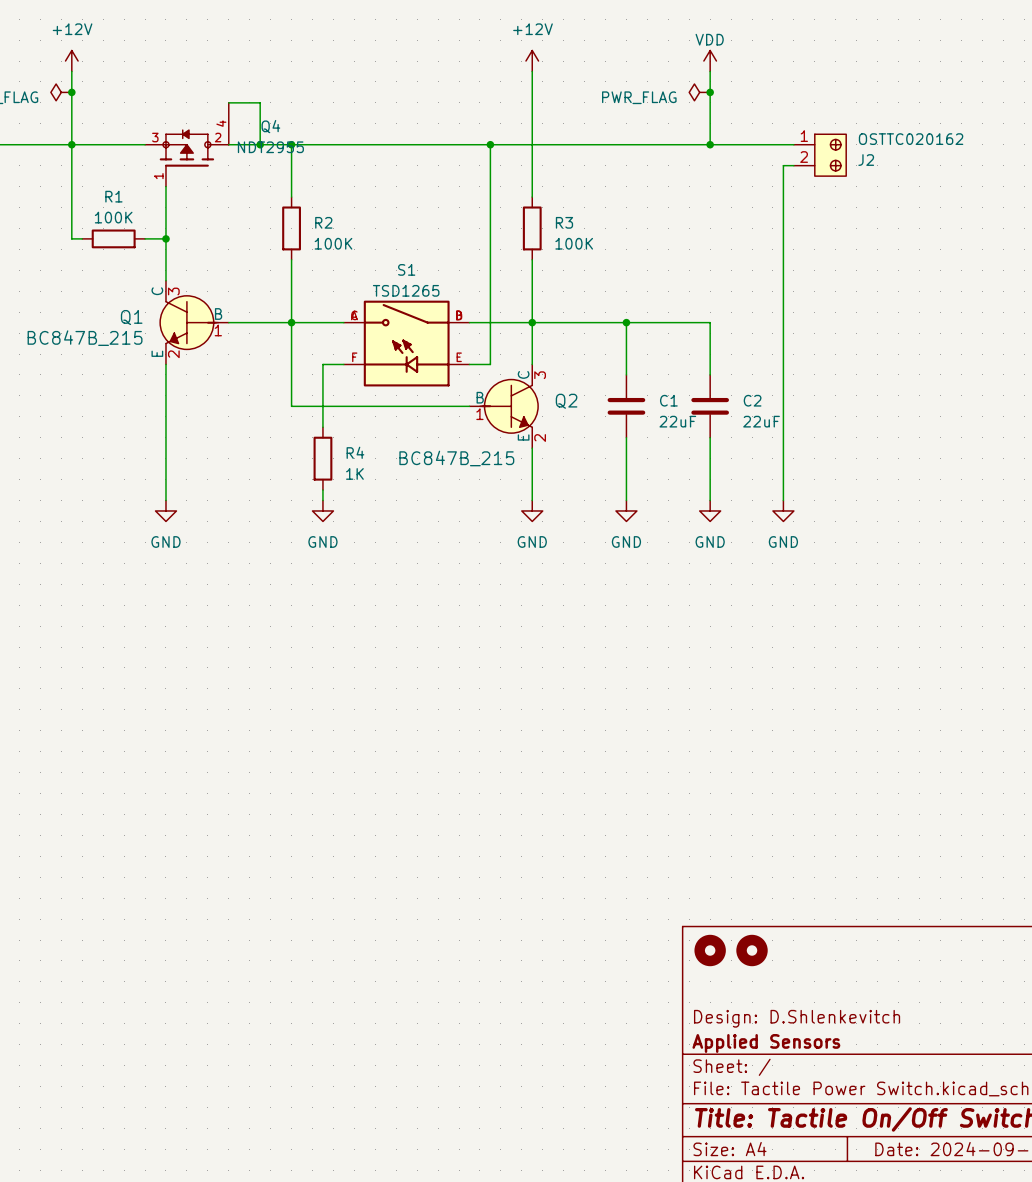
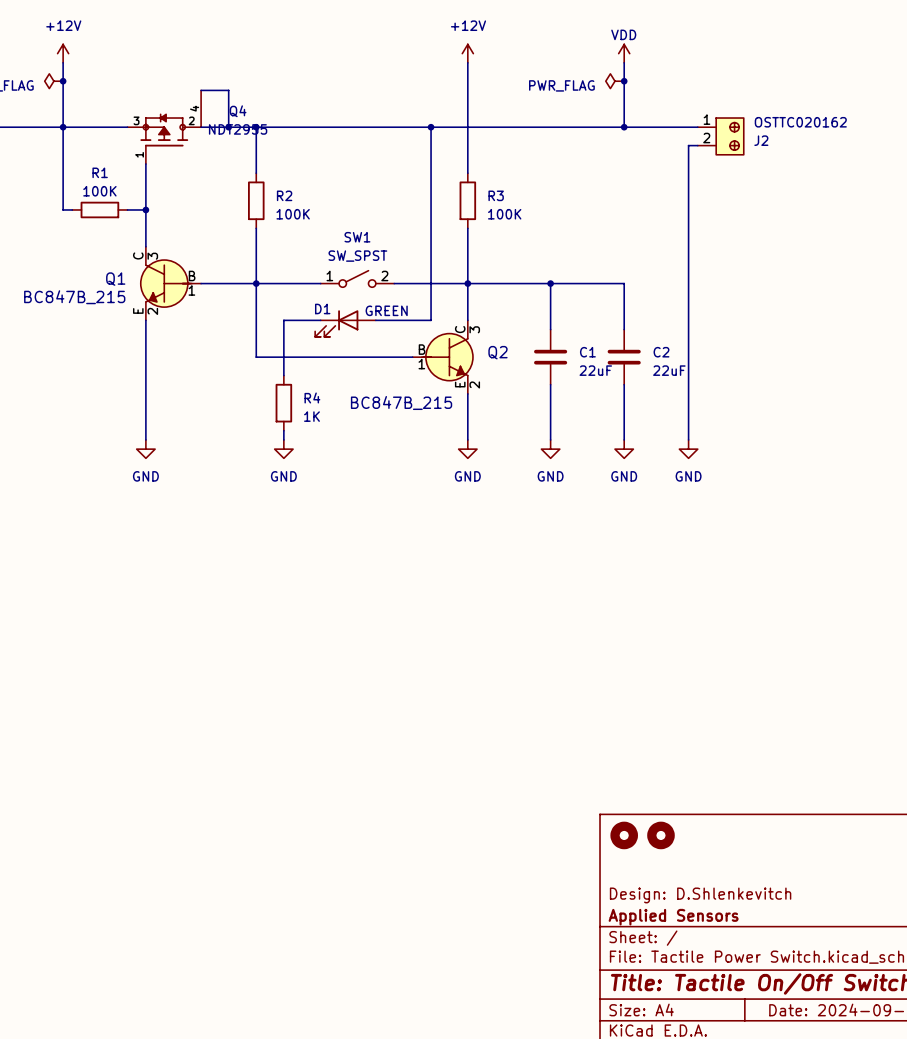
SW1: none -> SW_SPST (357, 278)
S1: TSD1265 (406, 343) -> none
D1: none -> GREEN (345, 323)

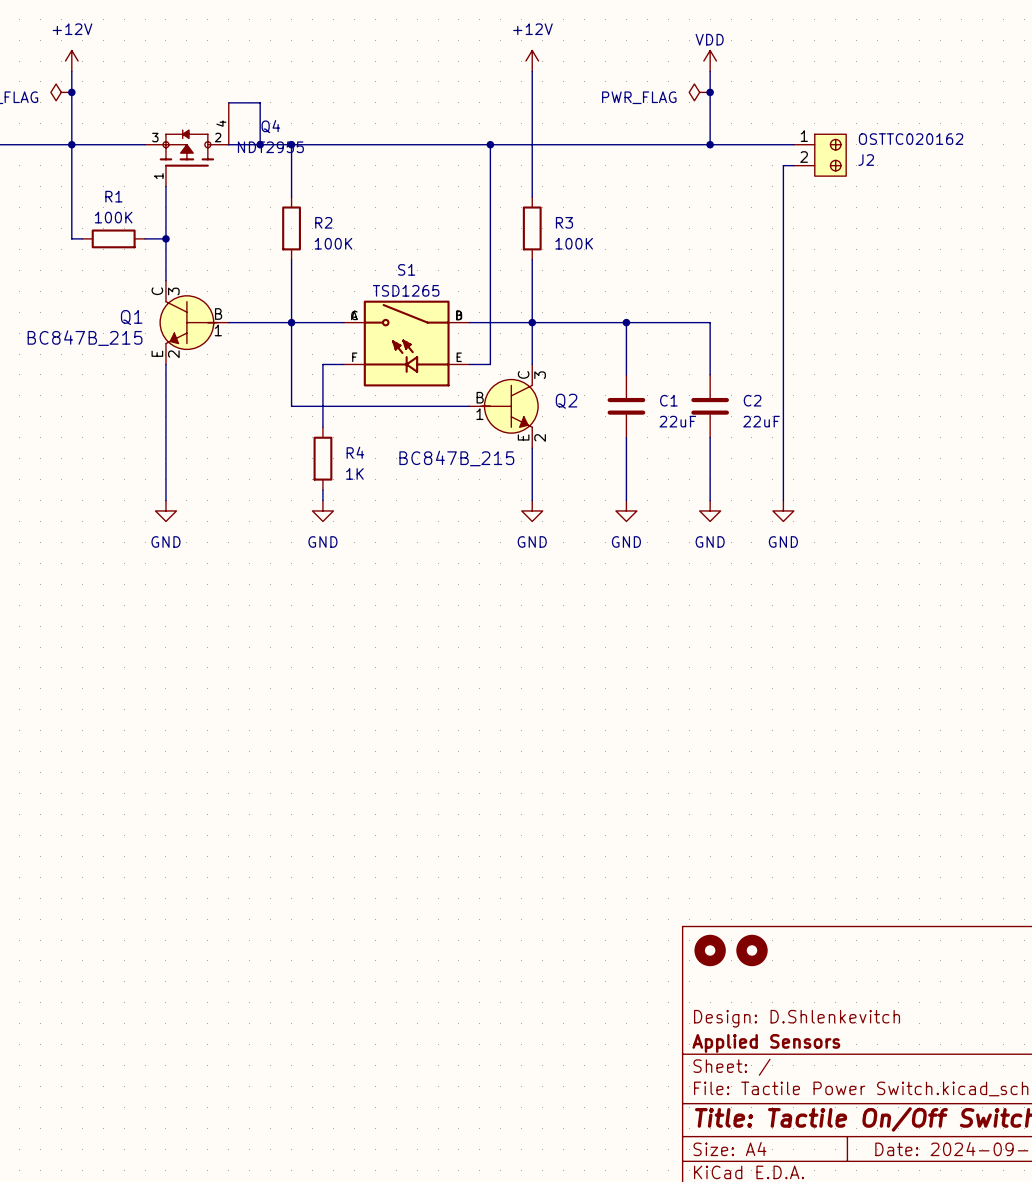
SW1: SW_SPST (357, 278) -> none
S1: none -> TSD1265 (406, 343)
D1: GREEN (345, 323) -> none

